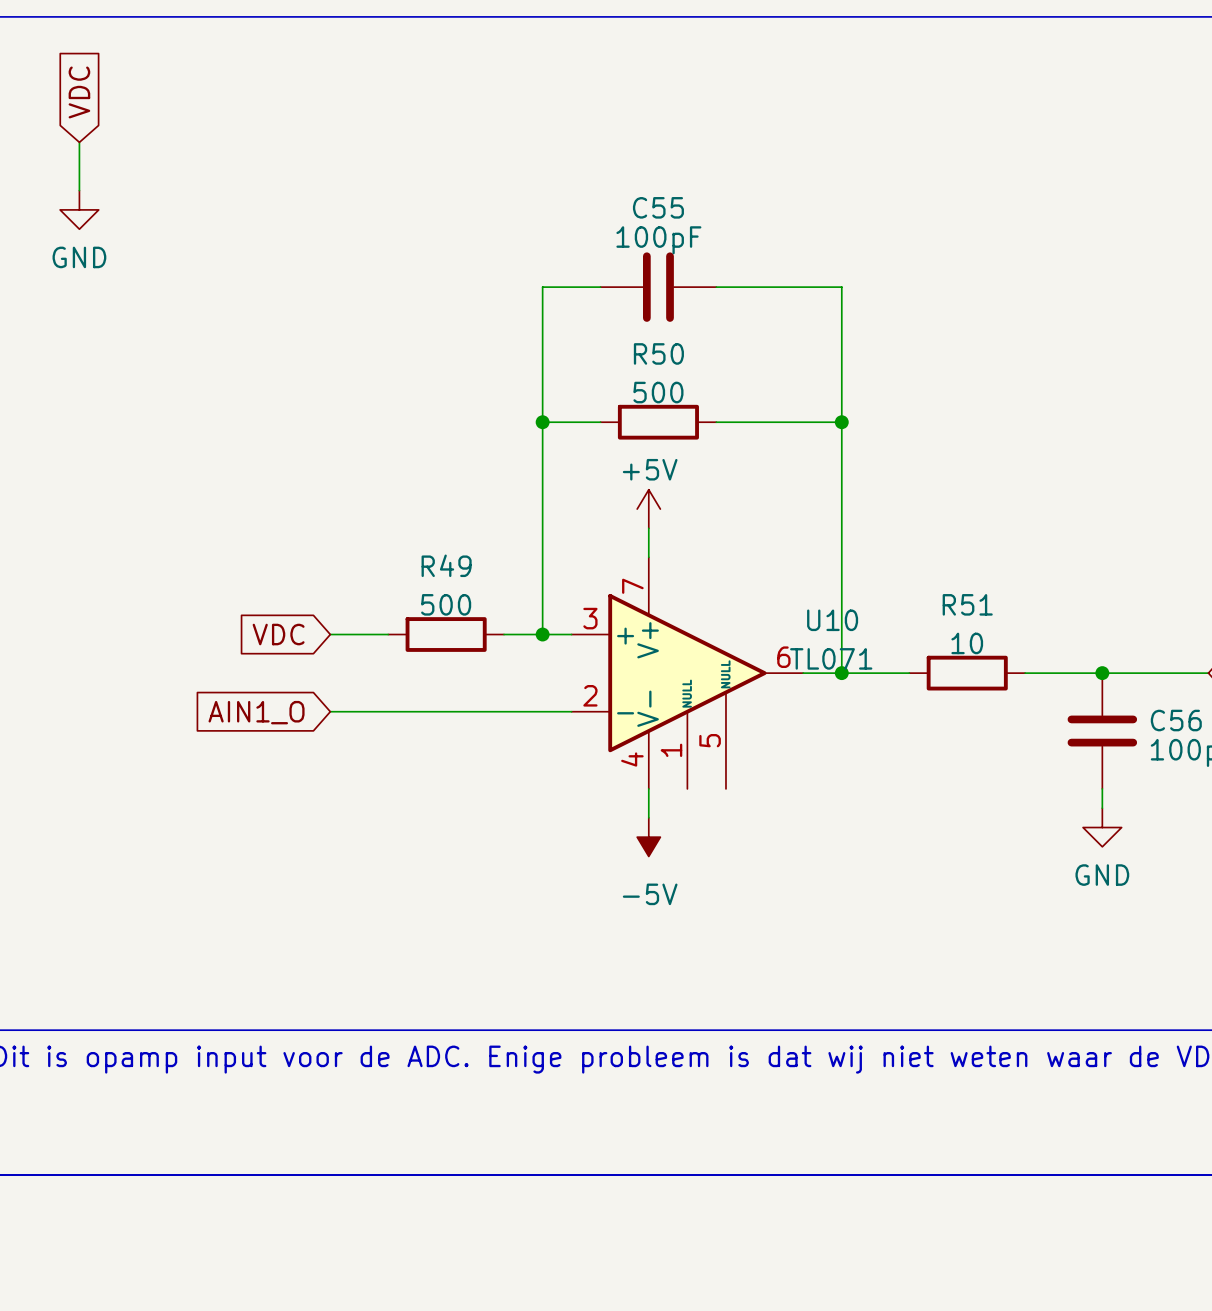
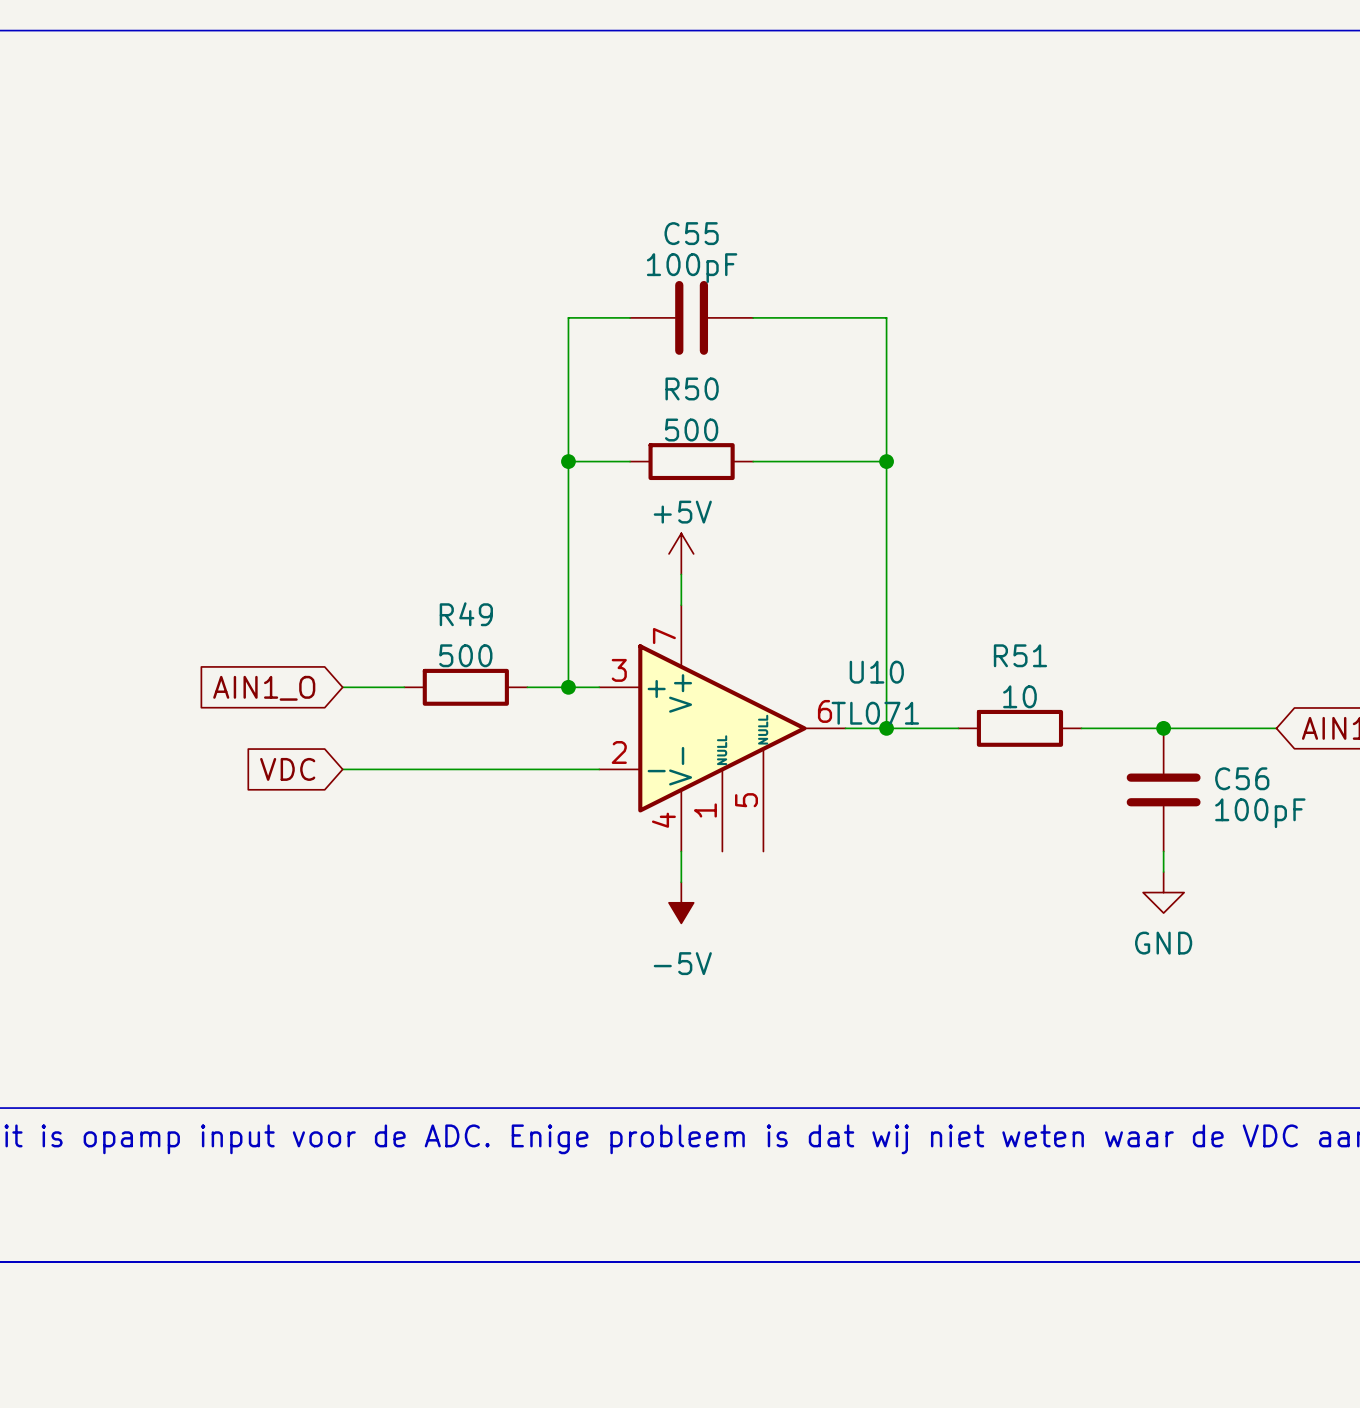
global label: VDC (79, 92) -> none
wire: (79, 142) (79, 190) -> none
power symbol: GND (79, 209) -> none
global label: VDC (278, 634) -> AIN1_O (264, 688)
global label: AIN1_O (256, 712) -> VDC (287, 769)

